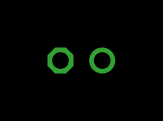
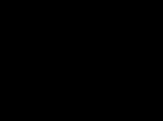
part: (81, 60) -> none

